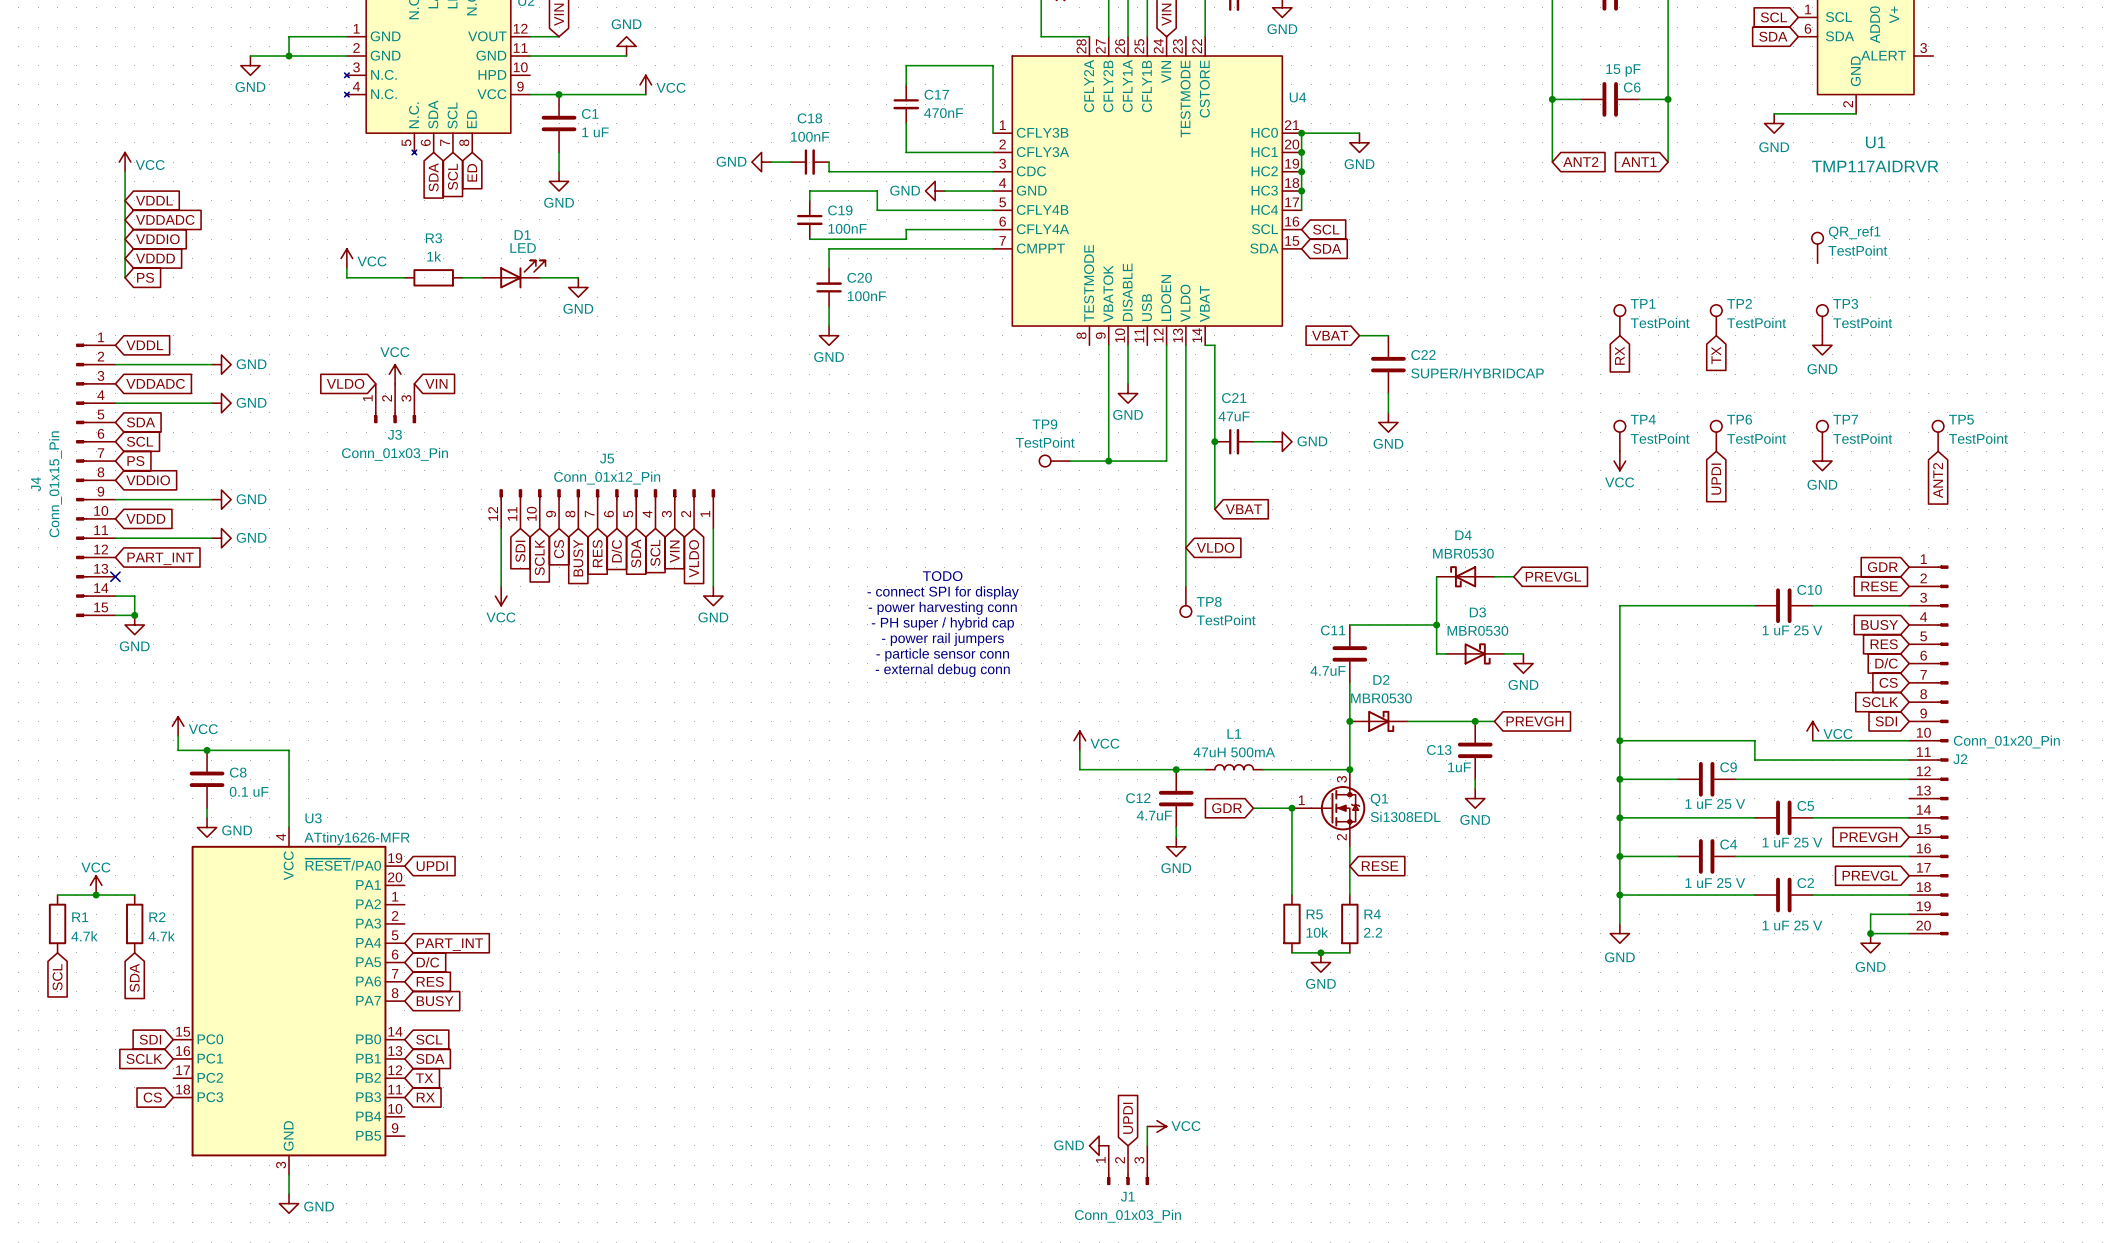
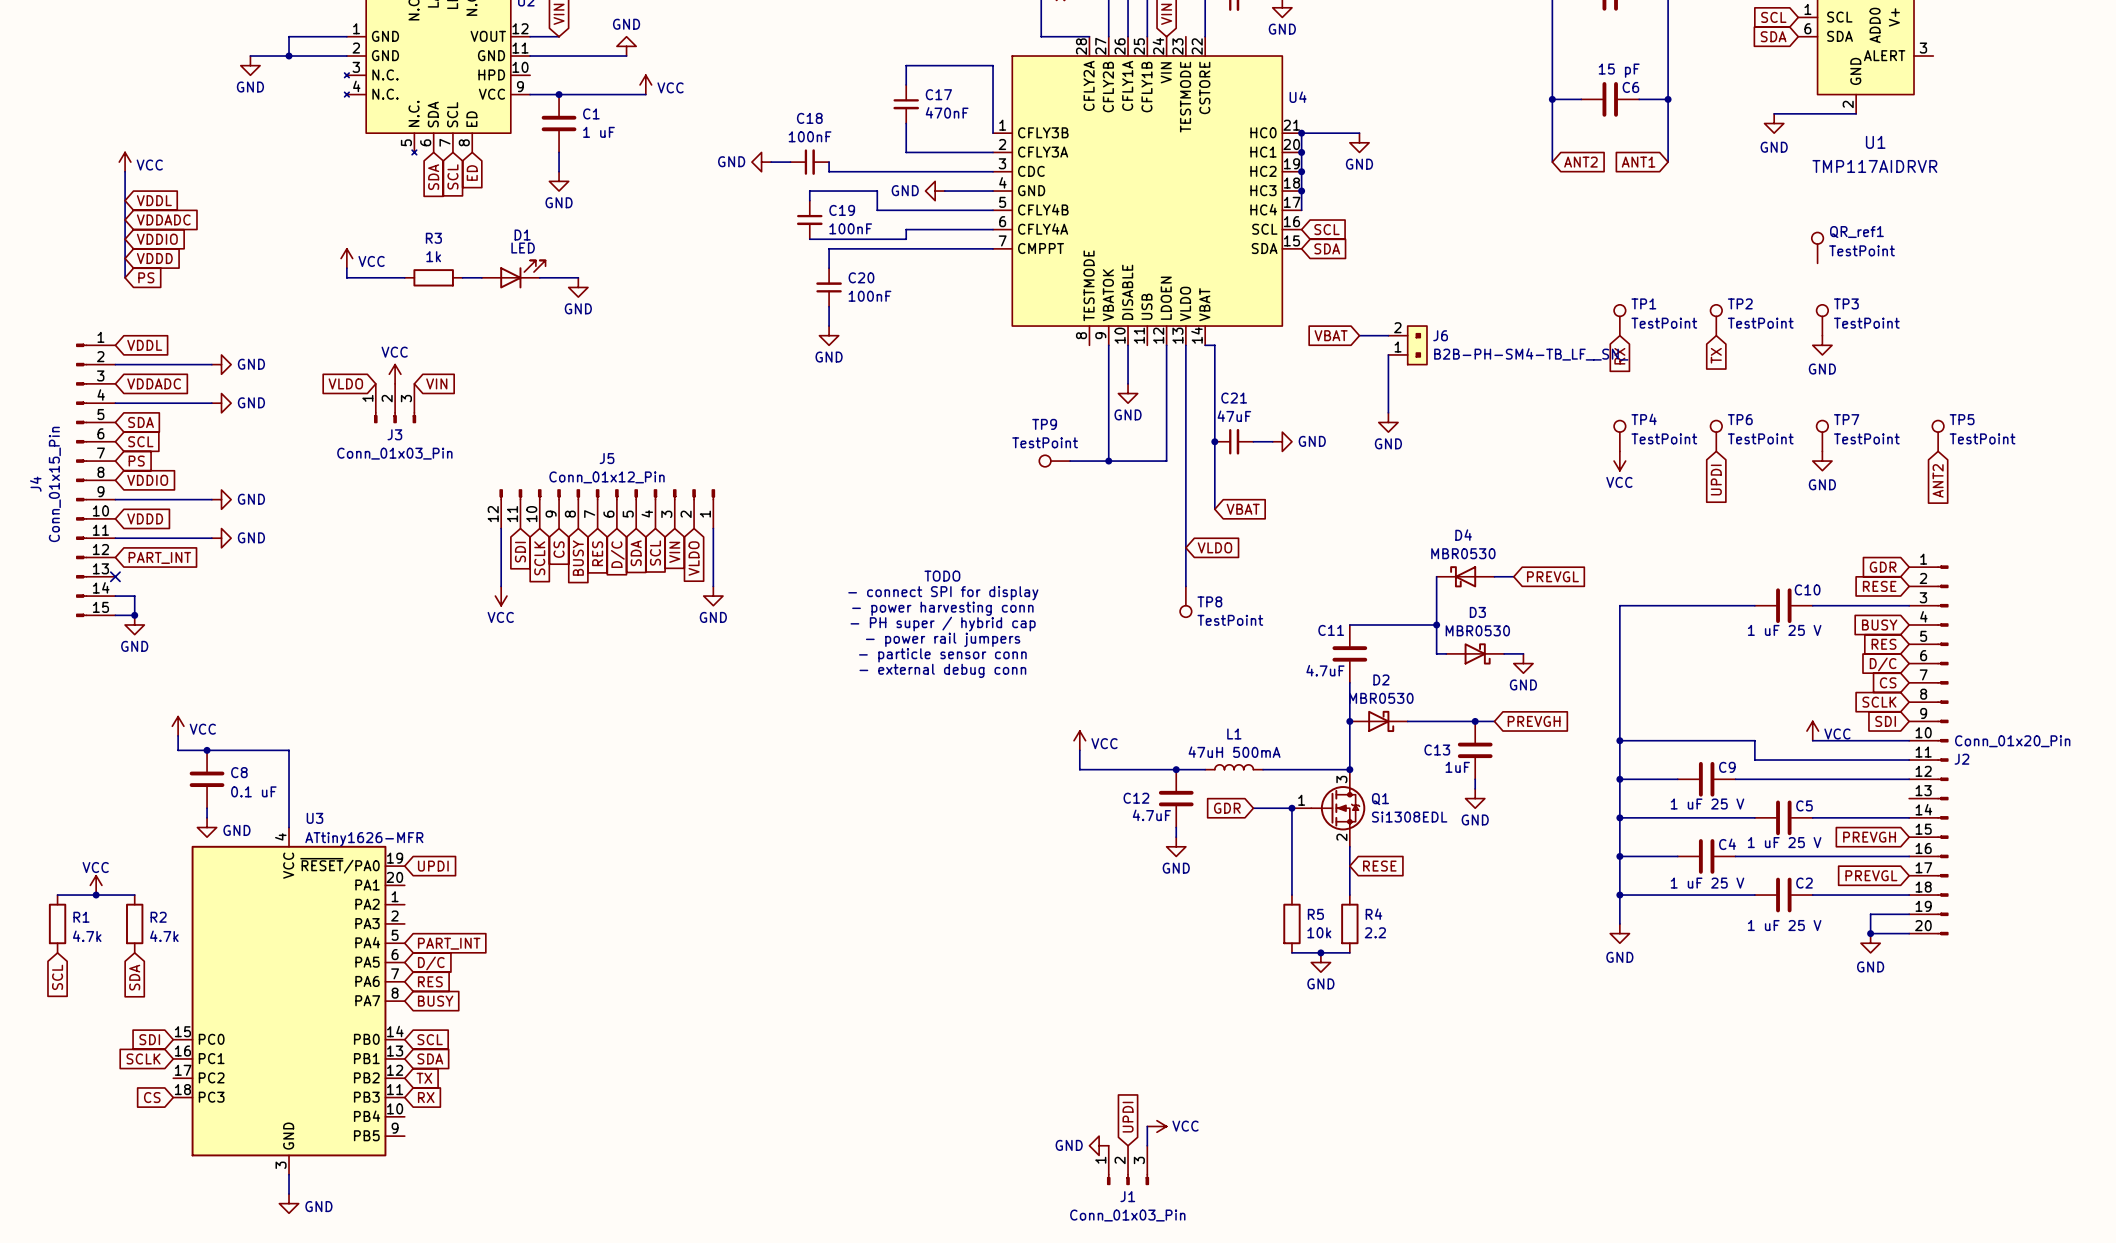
J6: none -> B2B-PH-SM4-TB_LF__SN_ (1407, 345)
C22: SUPER/HYBRIDCAP (1388, 364) -> none

